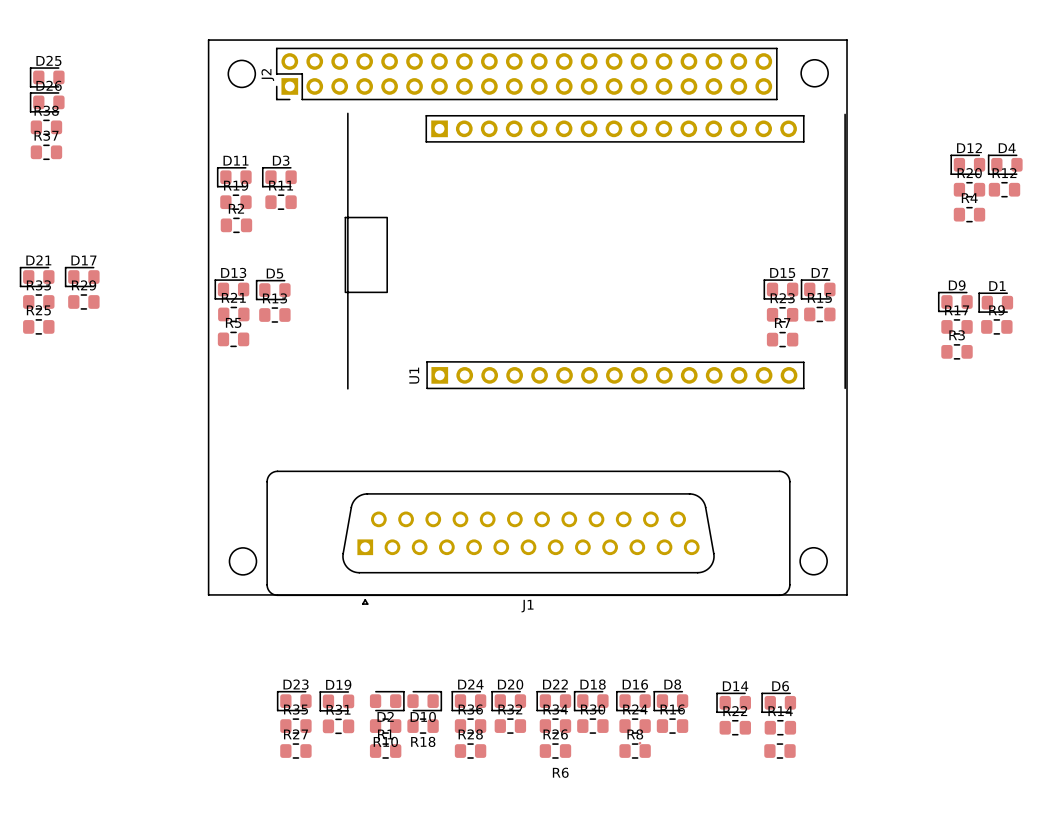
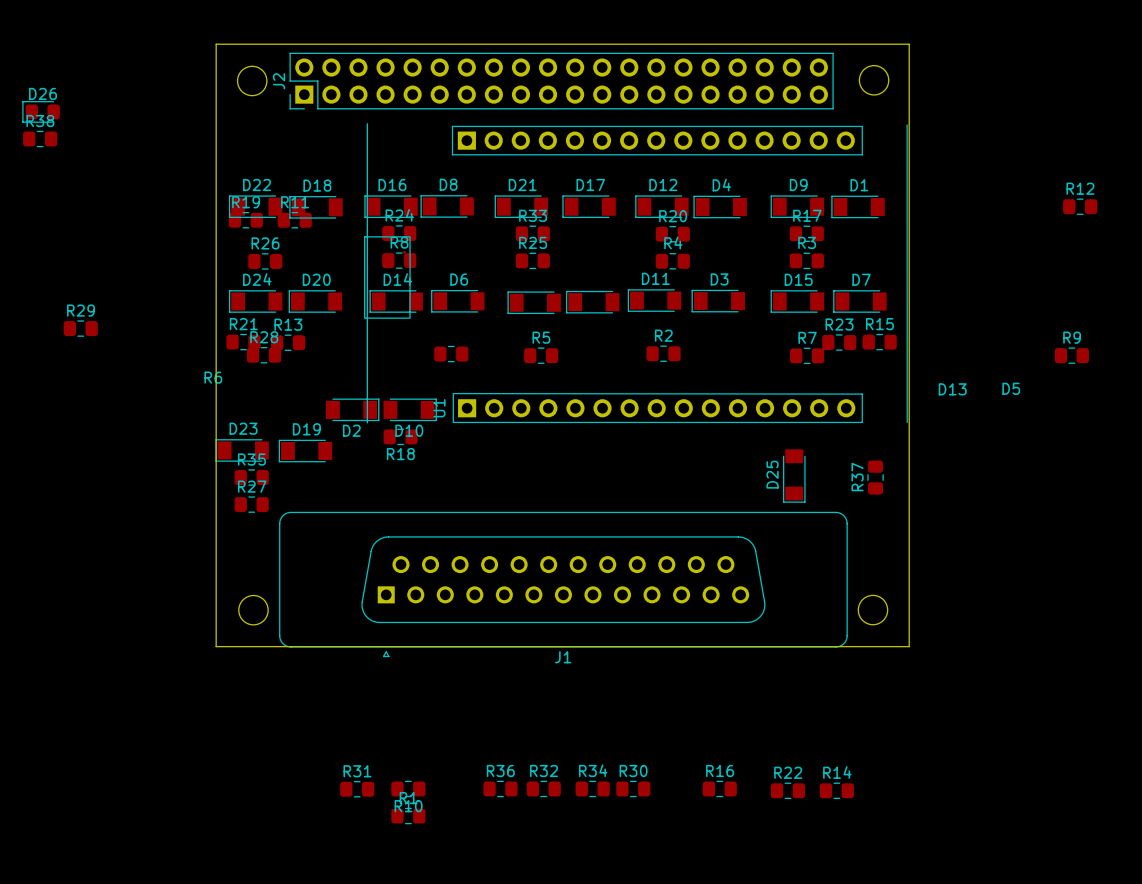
D25 name position: D25 (48, 60) -> D25 (772, 474)
D25 footprint: [30, 67, 65, 88] -> [783, 449, 806, 503]
R37 name position: R37 (46, 135) -> R37 (857, 477)
R37 rotation: 0° (46, 152) -> 90° clockwise (875, 477)
R37 position: (46, 152) -> (875, 477)
D12 footprint: [950, 154, 986, 175] -> [635, 195, 689, 219]
D4 footprint: [988, 154, 1023, 175] -> [693, 195, 747, 219]
D11 footprint: [217, 167, 252, 188] -> [627, 289, 682, 312]
D3 footprint: [262, 167, 297, 188] -> [691, 289, 745, 313]
R20 position: (969, 189) -> (672, 234)
R4 position: (969, 214) -> (672, 261)
R2 position: (236, 225) -> (663, 353)
track: none -> (404, 251) (404, 252)
D21 footprint: [19, 267, 55, 288] -> [494, 195, 549, 219]
D17 footprint: [65, 267, 100, 288] -> [562, 195, 616, 219]
D13 name position: D13 (233, 272) -> D13 (952, 389)
D5 name position: D5 (274, 273) -> D5 (1011, 388)
D13 footprint: [214, 279, 250, 300] -> [507, 291, 561, 315]
D15 footprint: [763, 279, 799, 300] -> [770, 290, 825, 313]
D7 footprint: [800, 279, 836, 300] -> [833, 290, 887, 313]
D5 footprint: [256, 280, 291, 301] -> [566, 290, 620, 314]
D9 footprint: [938, 291, 973, 313] -> [770, 195, 825, 219]
D1 footprint: [978, 292, 1014, 313] -> [831, 195, 885, 219]
R33 position: (38, 301) -> (532, 233)
R25 position: (38, 326) -> (532, 260)
R17 position: (957, 326) -> (806, 233)
R5 position: (233, 339) -> (541, 355)
R7 position: (782, 339) -> (807, 355)
R3 position: (957, 351) -> (806, 260)
D23 footprint: [277, 691, 312, 712] -> [215, 439, 269, 462]
D19 footprint: [319, 691, 355, 712] -> [278, 439, 333, 463]
D2 footprint: [369, 691, 405, 712] -> [325, 398, 380, 422]
D10 footprint: [407, 691, 442, 712] -> [383, 398, 437, 422]
D24 footprint: [451, 691, 487, 712] -> [228, 290, 283, 313]
D20 footprint: [491, 691, 527, 712] -> [288, 290, 343, 313]
D22 footprint: [536, 691, 572, 712] -> [228, 195, 283, 219]
D18 footprint: [574, 691, 609, 712] -> [289, 196, 343, 219]
D16 footprint: [616, 691, 651, 712] -> [364, 195, 418, 219]
D8 footprint: [653, 691, 689, 712] -> [420, 195, 474, 218]
D14 footprint: [716, 692, 751, 713] -> [369, 290, 423, 313]
D6 footprint: [761, 692, 797, 713] -> [431, 289, 485, 313]
R35 position: (295, 726) -> (251, 477)
R18 position: (423, 726) -> (400, 436)
R24 position: (635, 726) -> (399, 233)
track: (640, 743) (639, 743) -> none
R27 position: (295, 751) -> (251, 504)
R28 position: (470, 751) -> (264, 355)
R26 position: (555, 751) -> (265, 261)
R8 position: (635, 751) -> (399, 260)
R6 position: (779, 751) -> (451, 354)

